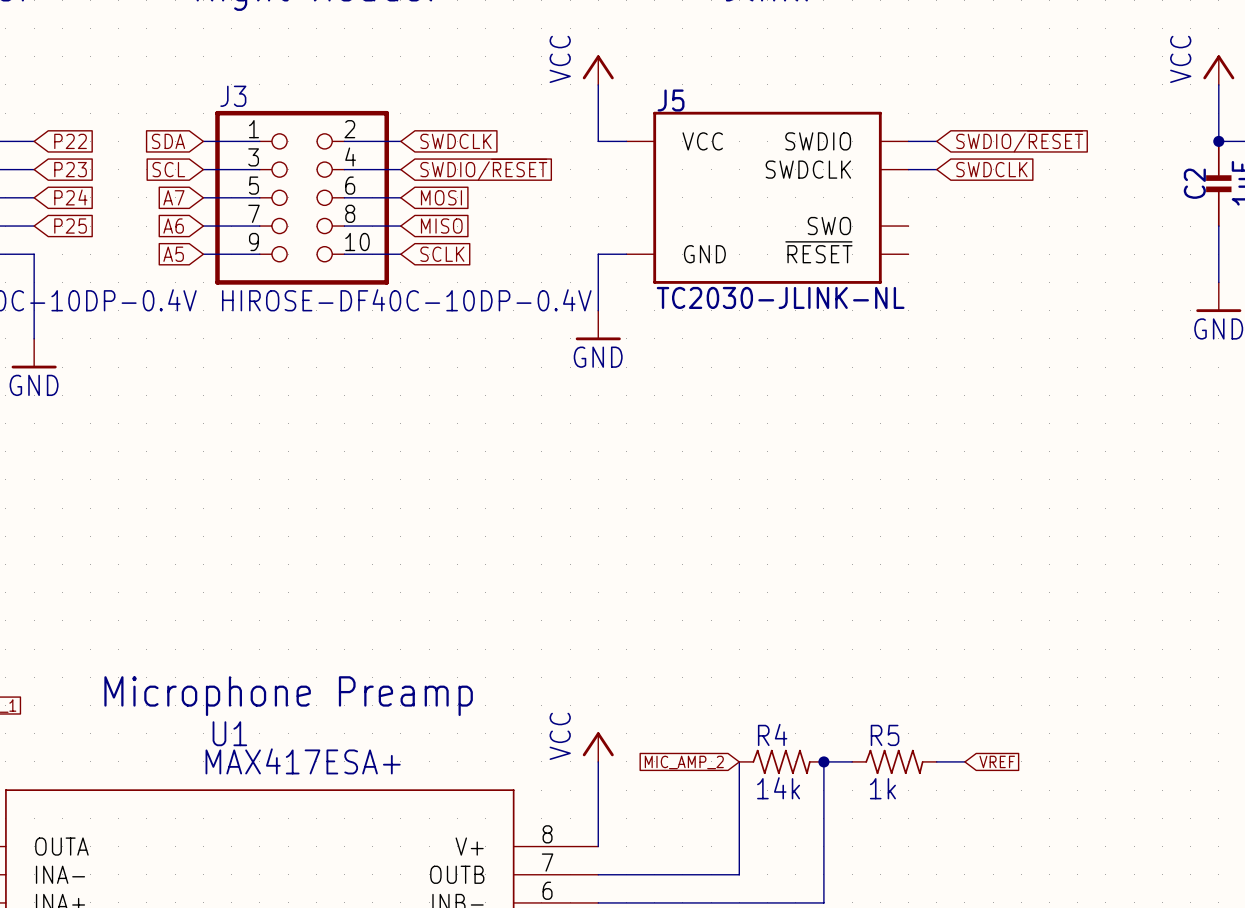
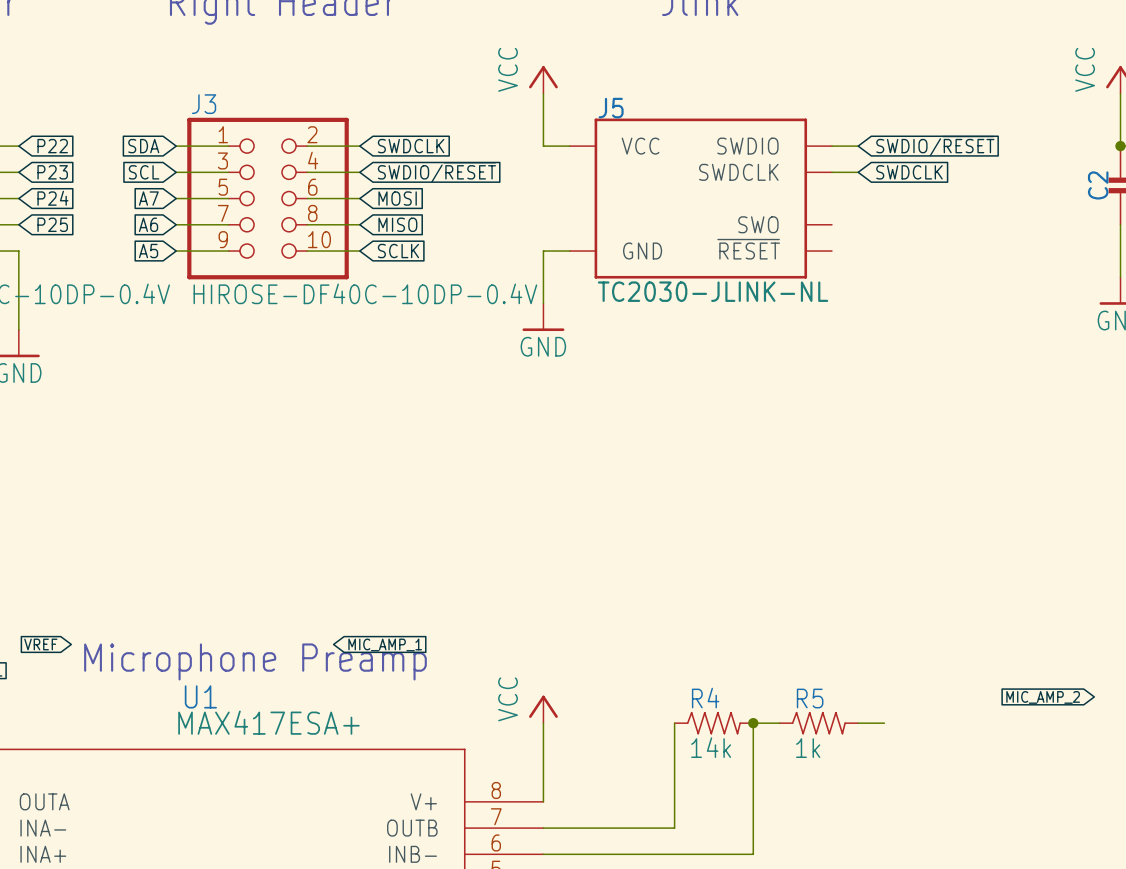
global label: none -> VREF (40, 644)
global label: none -> MIC_AMP_1 (385, 644)
global label: none -> MIC_AMP_2 (1043, 697)
global label: VREF (997, 761) -> none
global label: MIC_AMP_2 (684, 762) -> none

